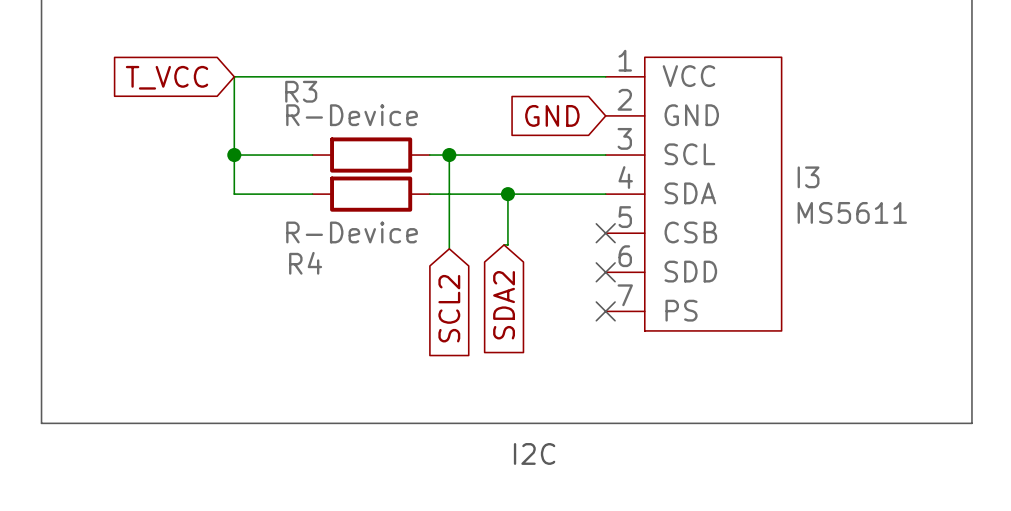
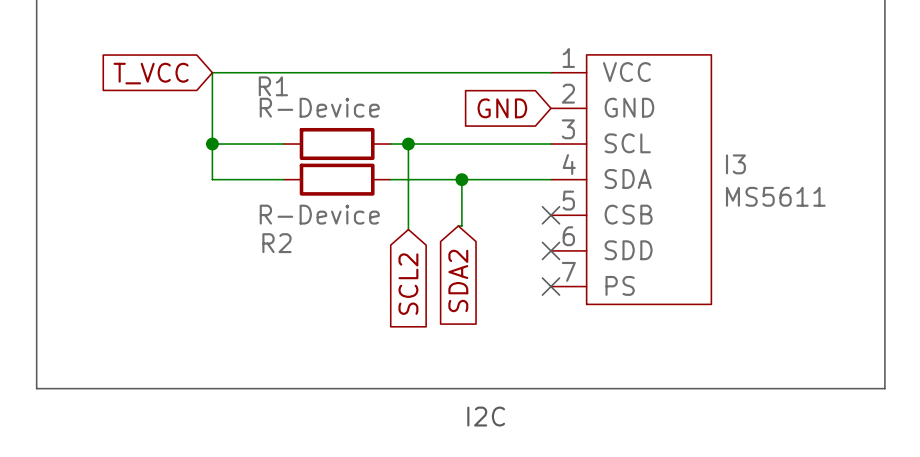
R3 name: R3 (301, 91) -> R1 (273, 86)
R4 name: R4 (305, 263) -> R2 (276, 243)

